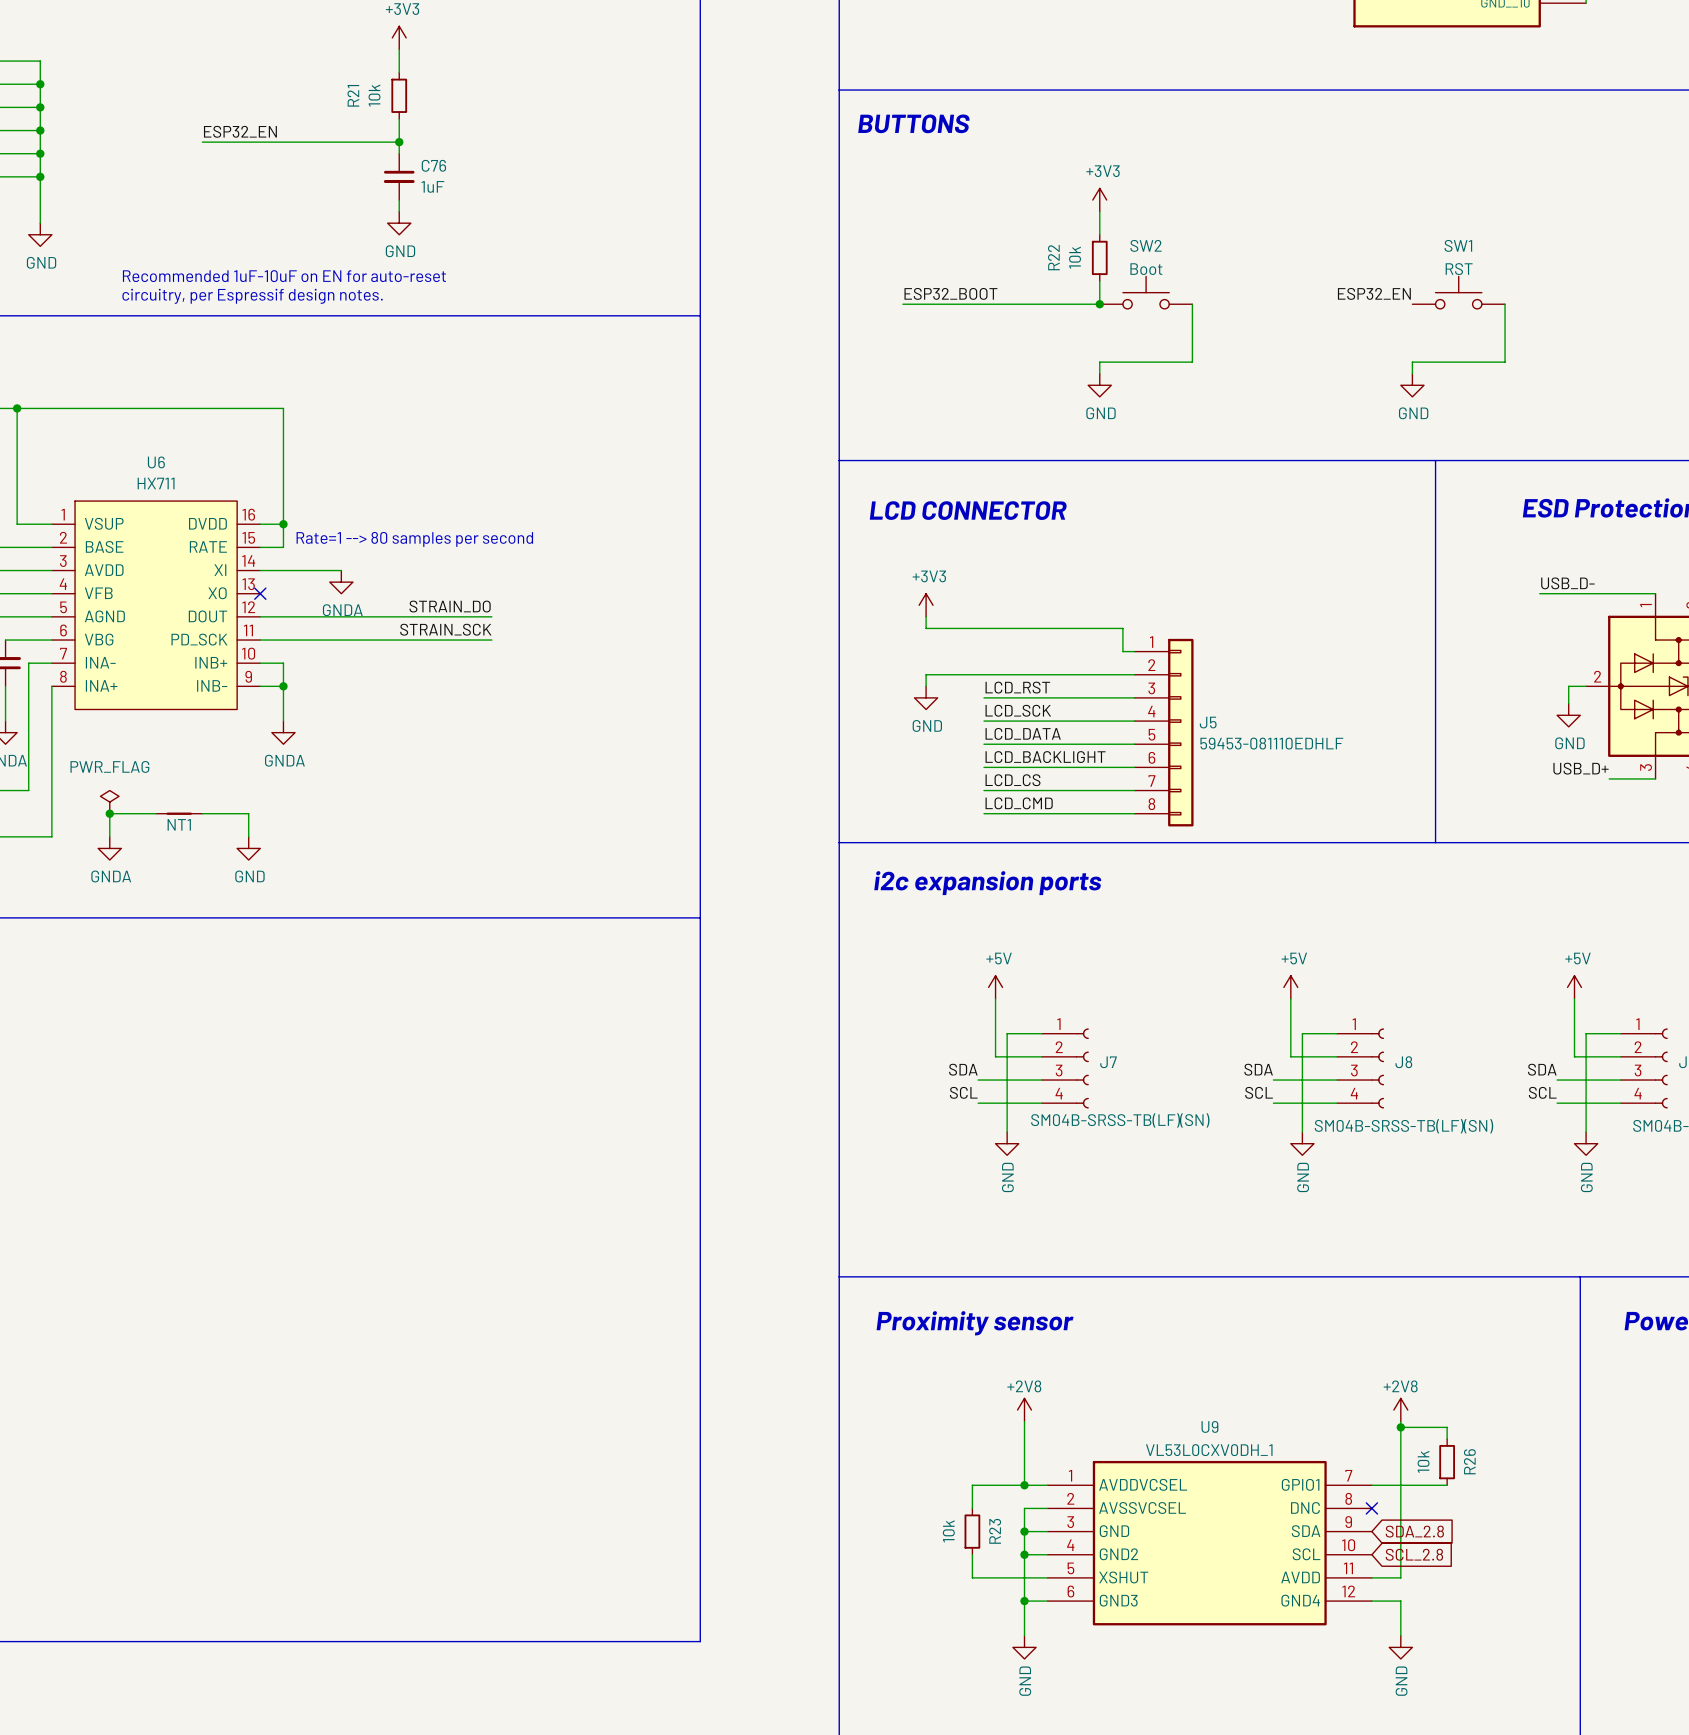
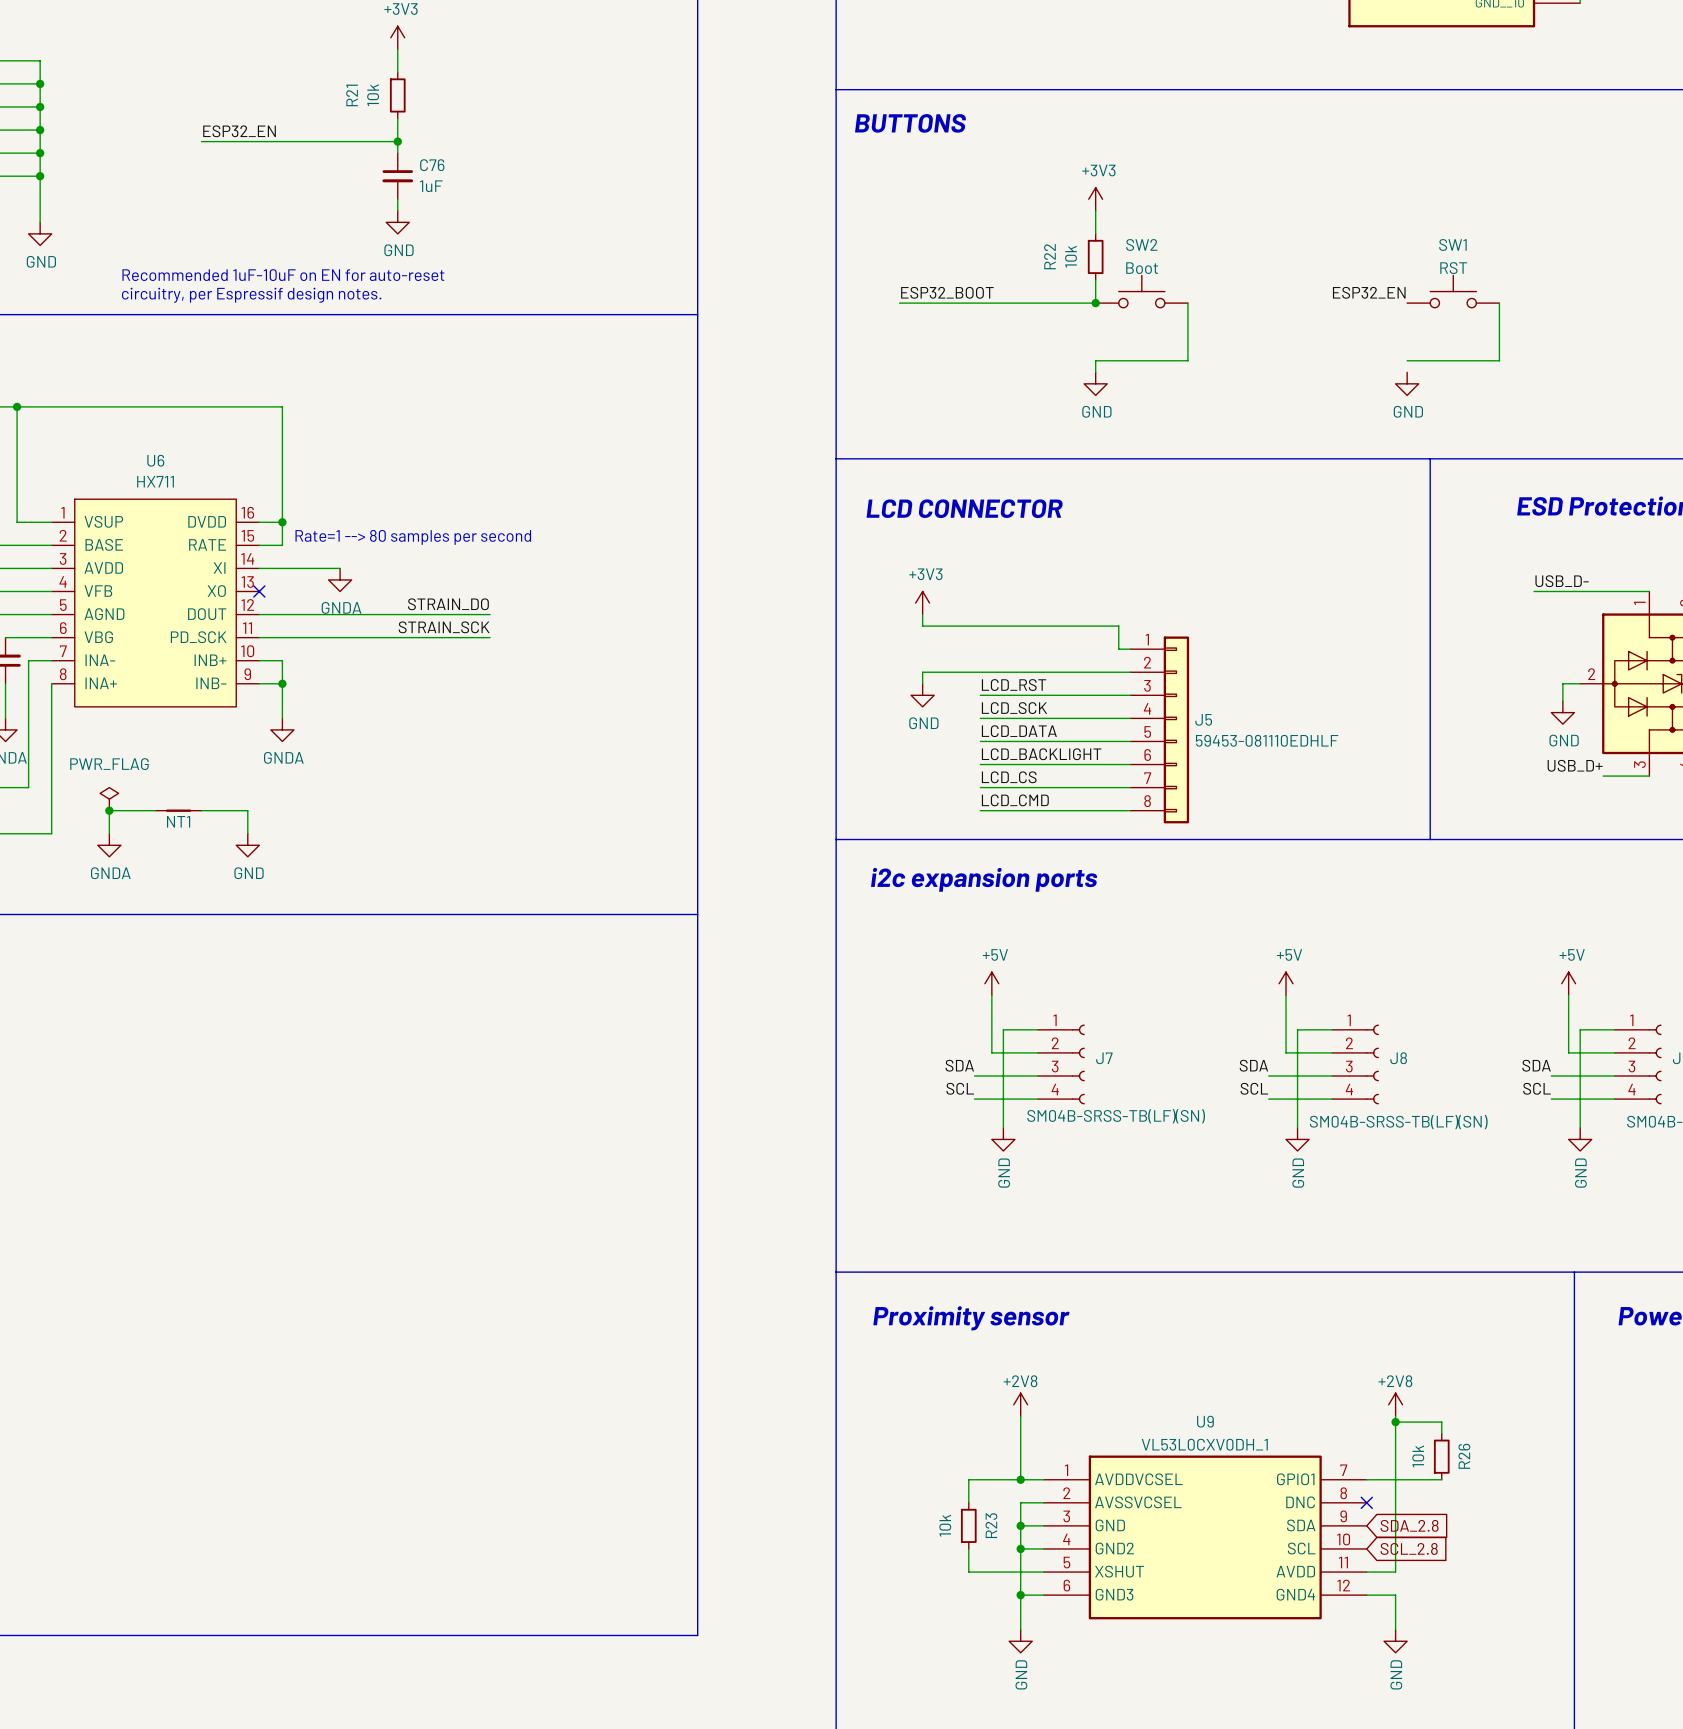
wire: (1412, 362) (1412, 373) -> none

